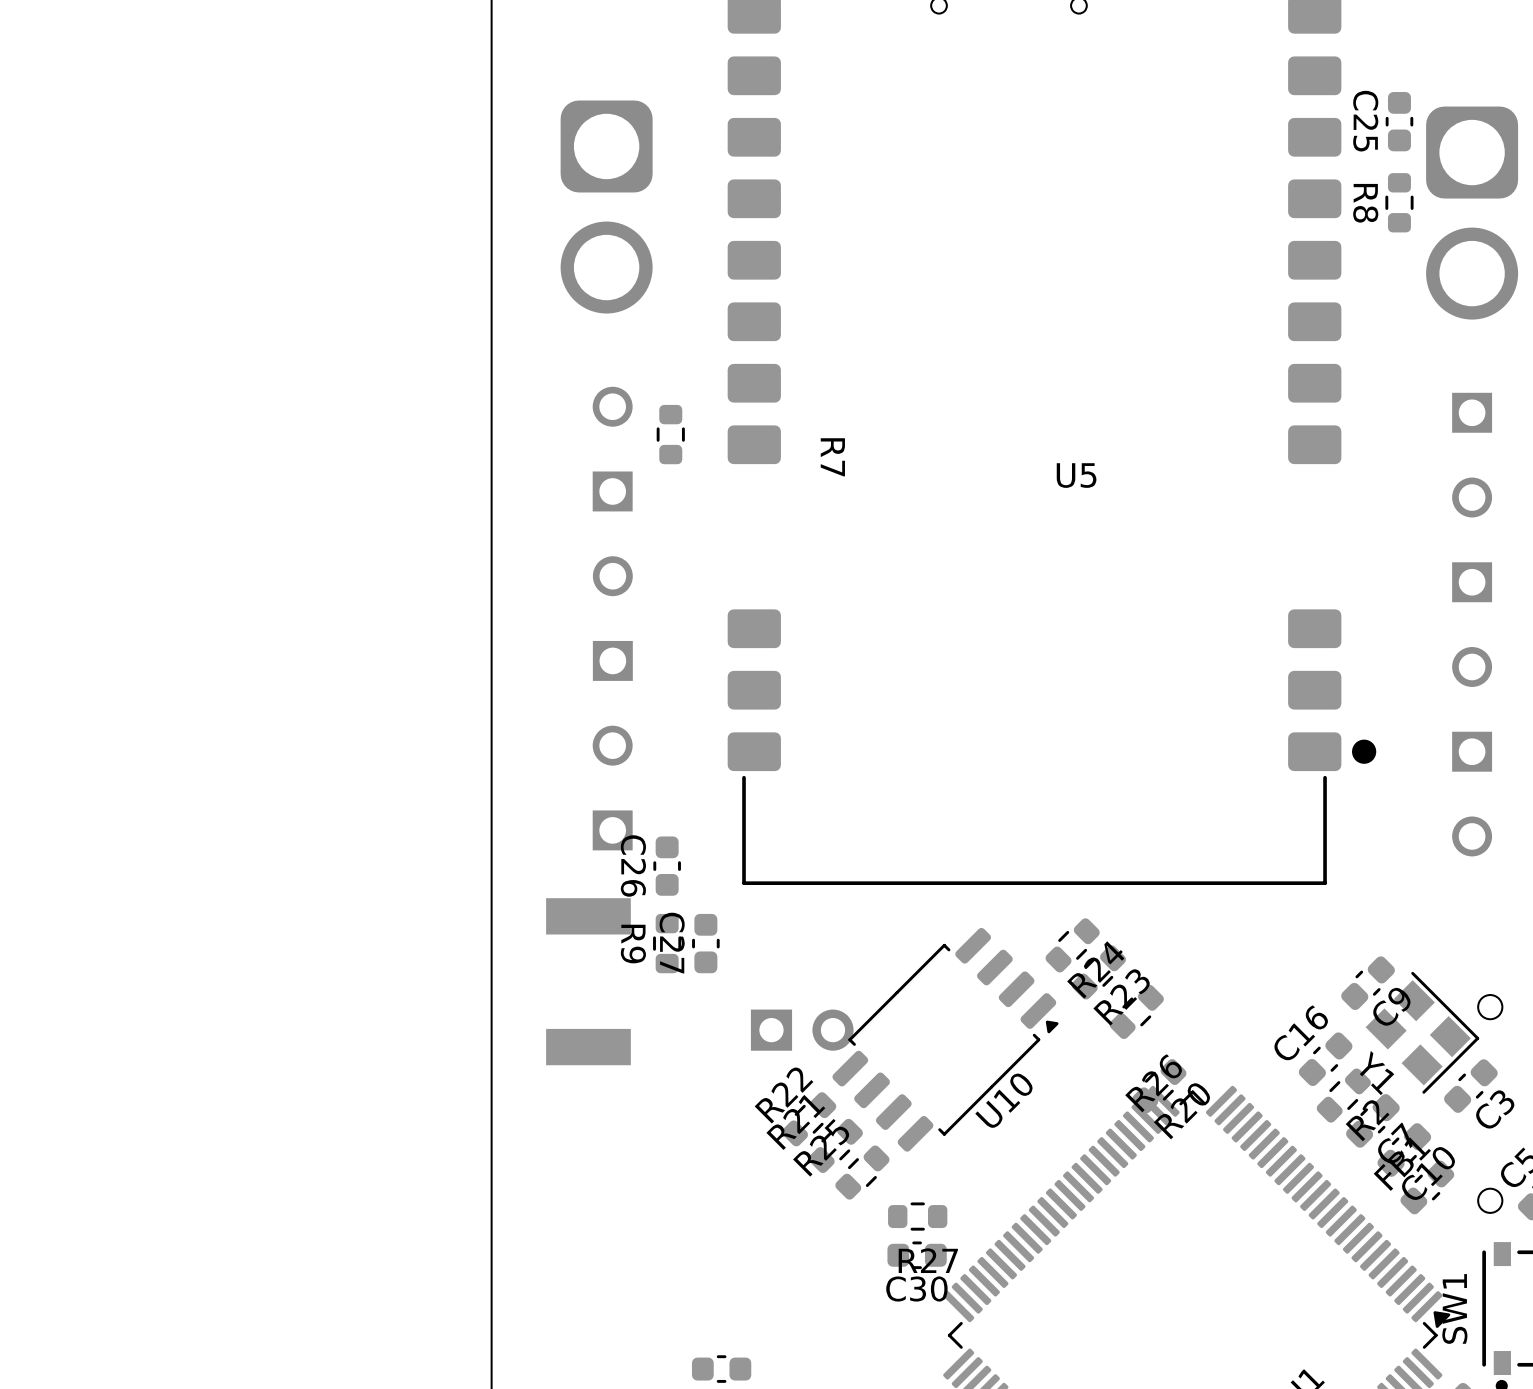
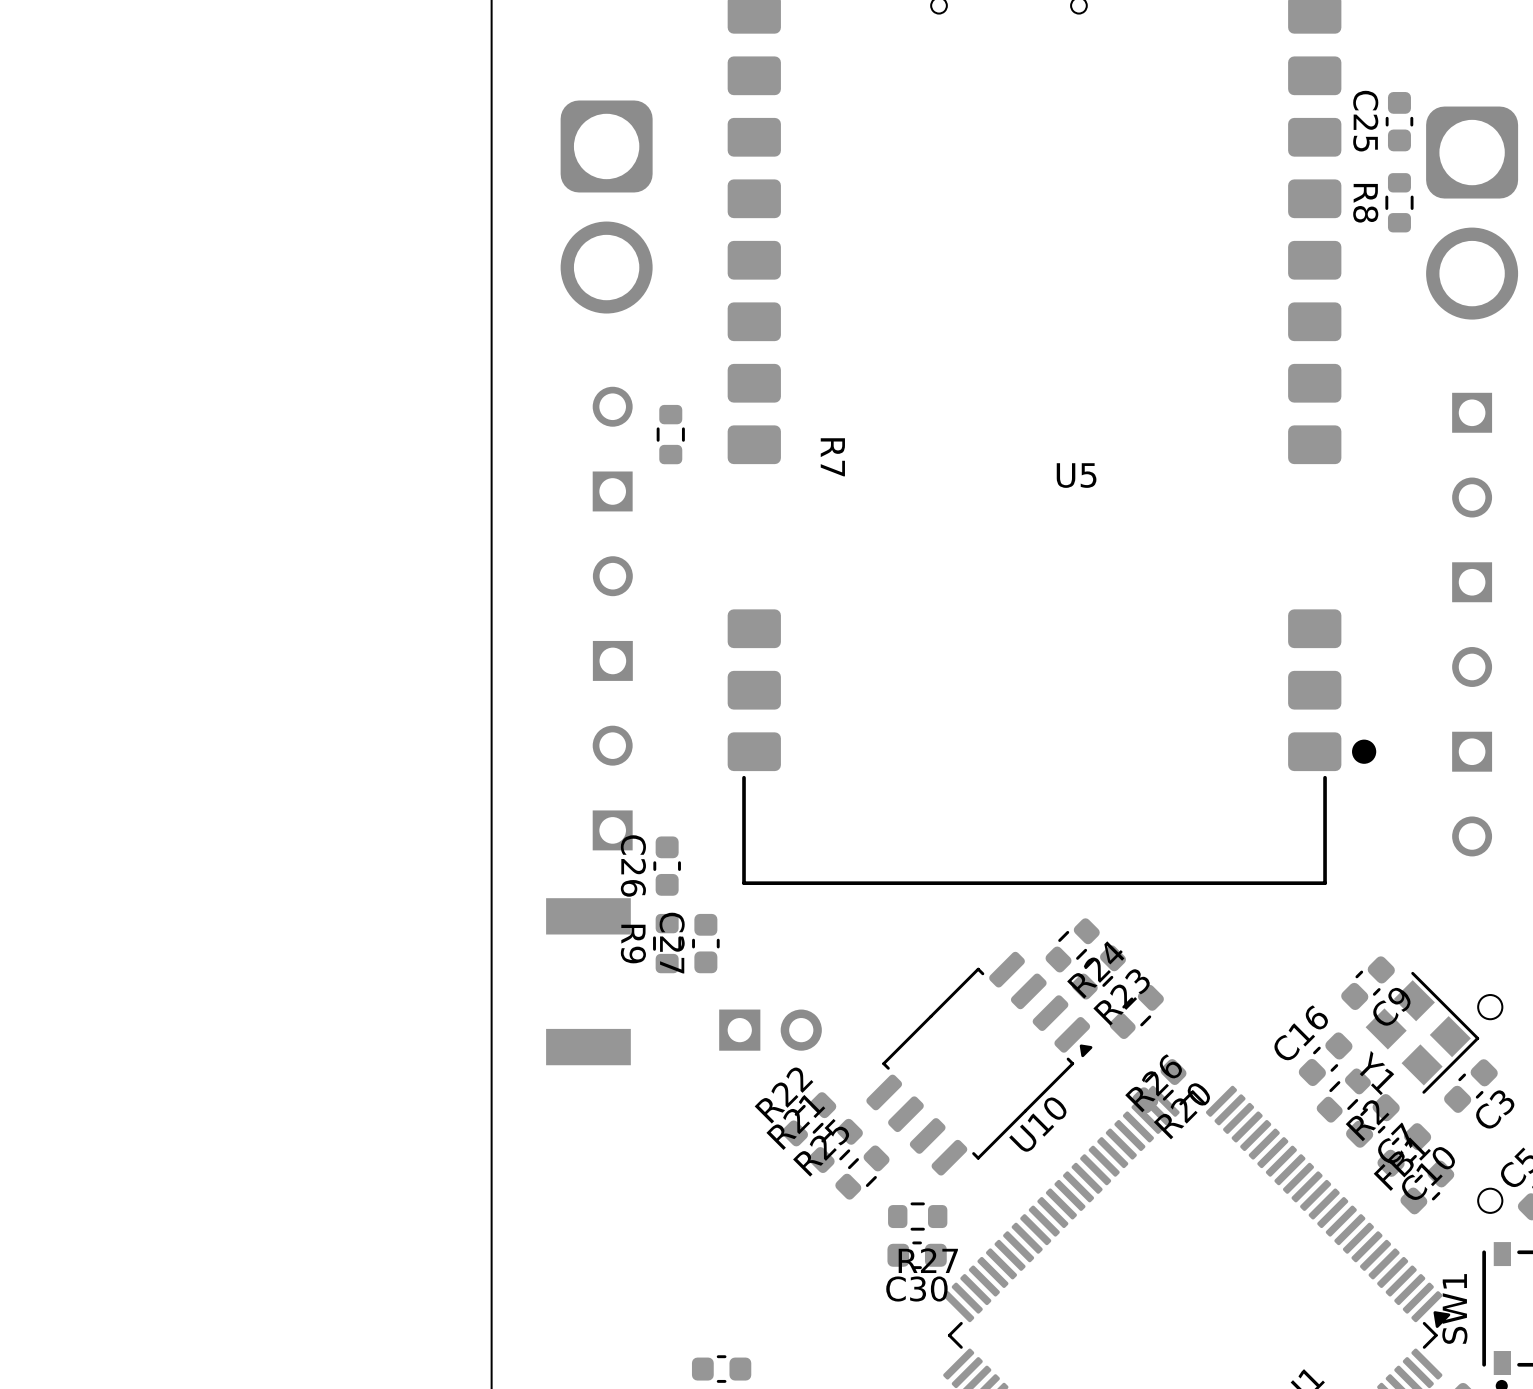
part position: (802, 1030) -> (770, 1030)
U10 position: (945, 1039) -> (979, 1063)

